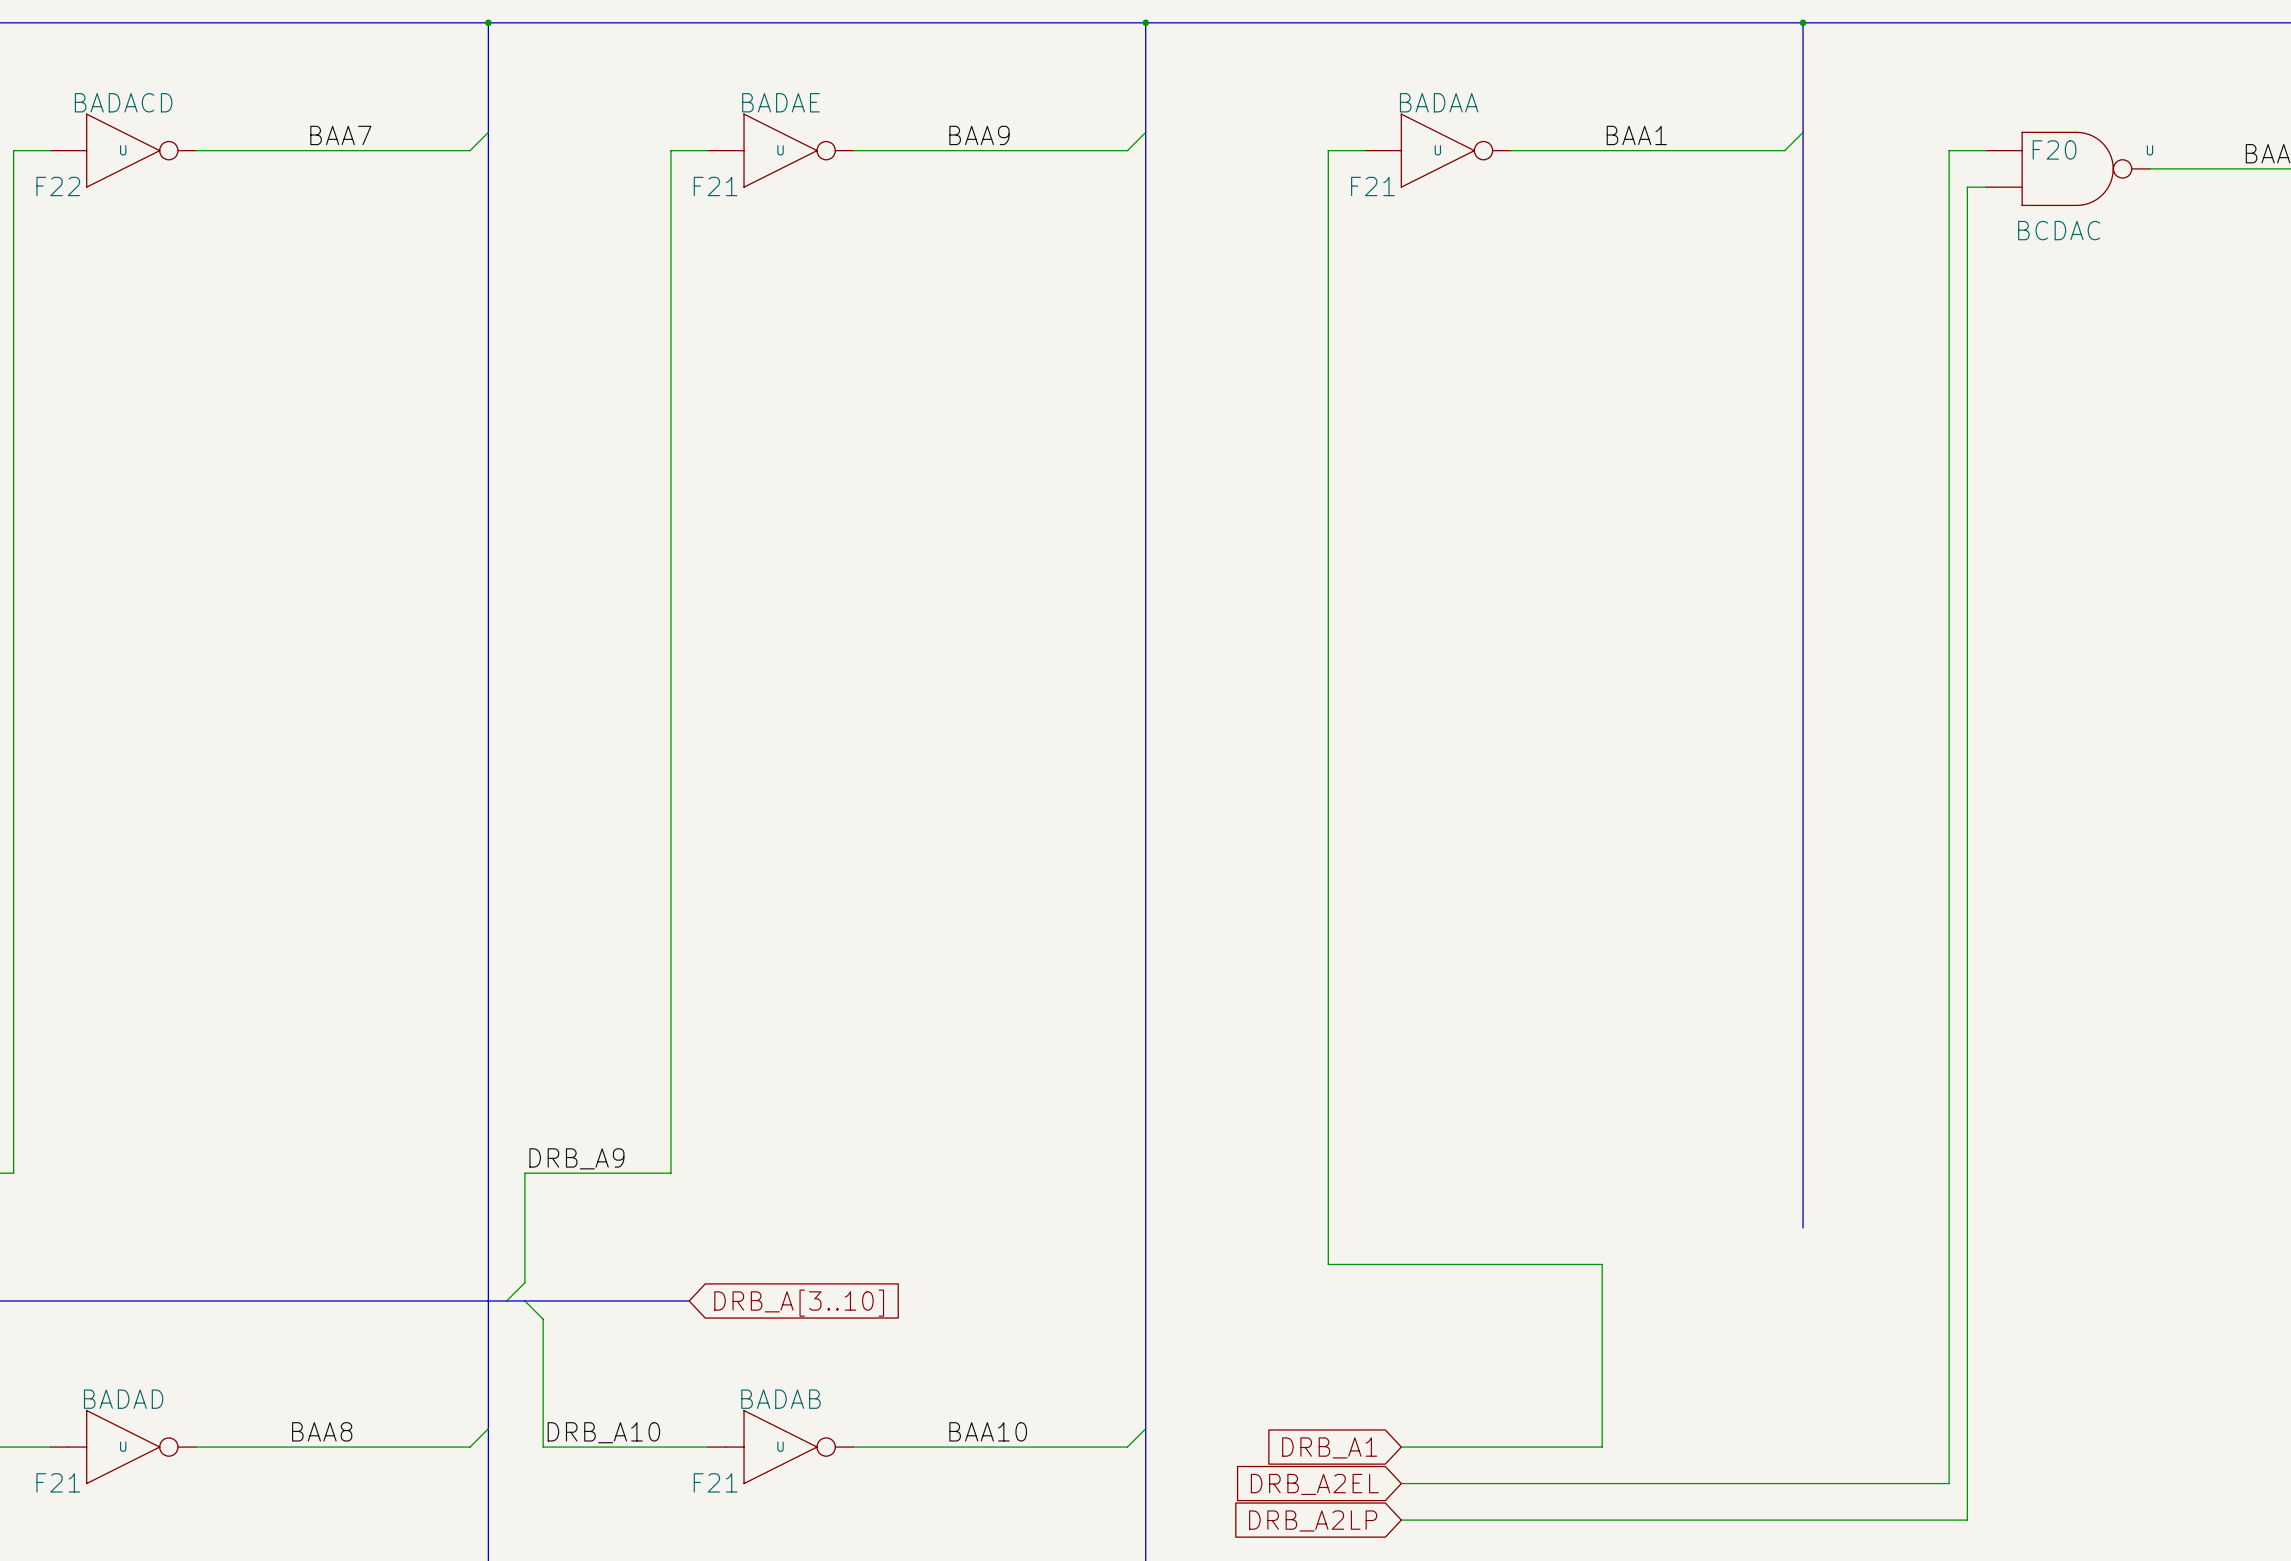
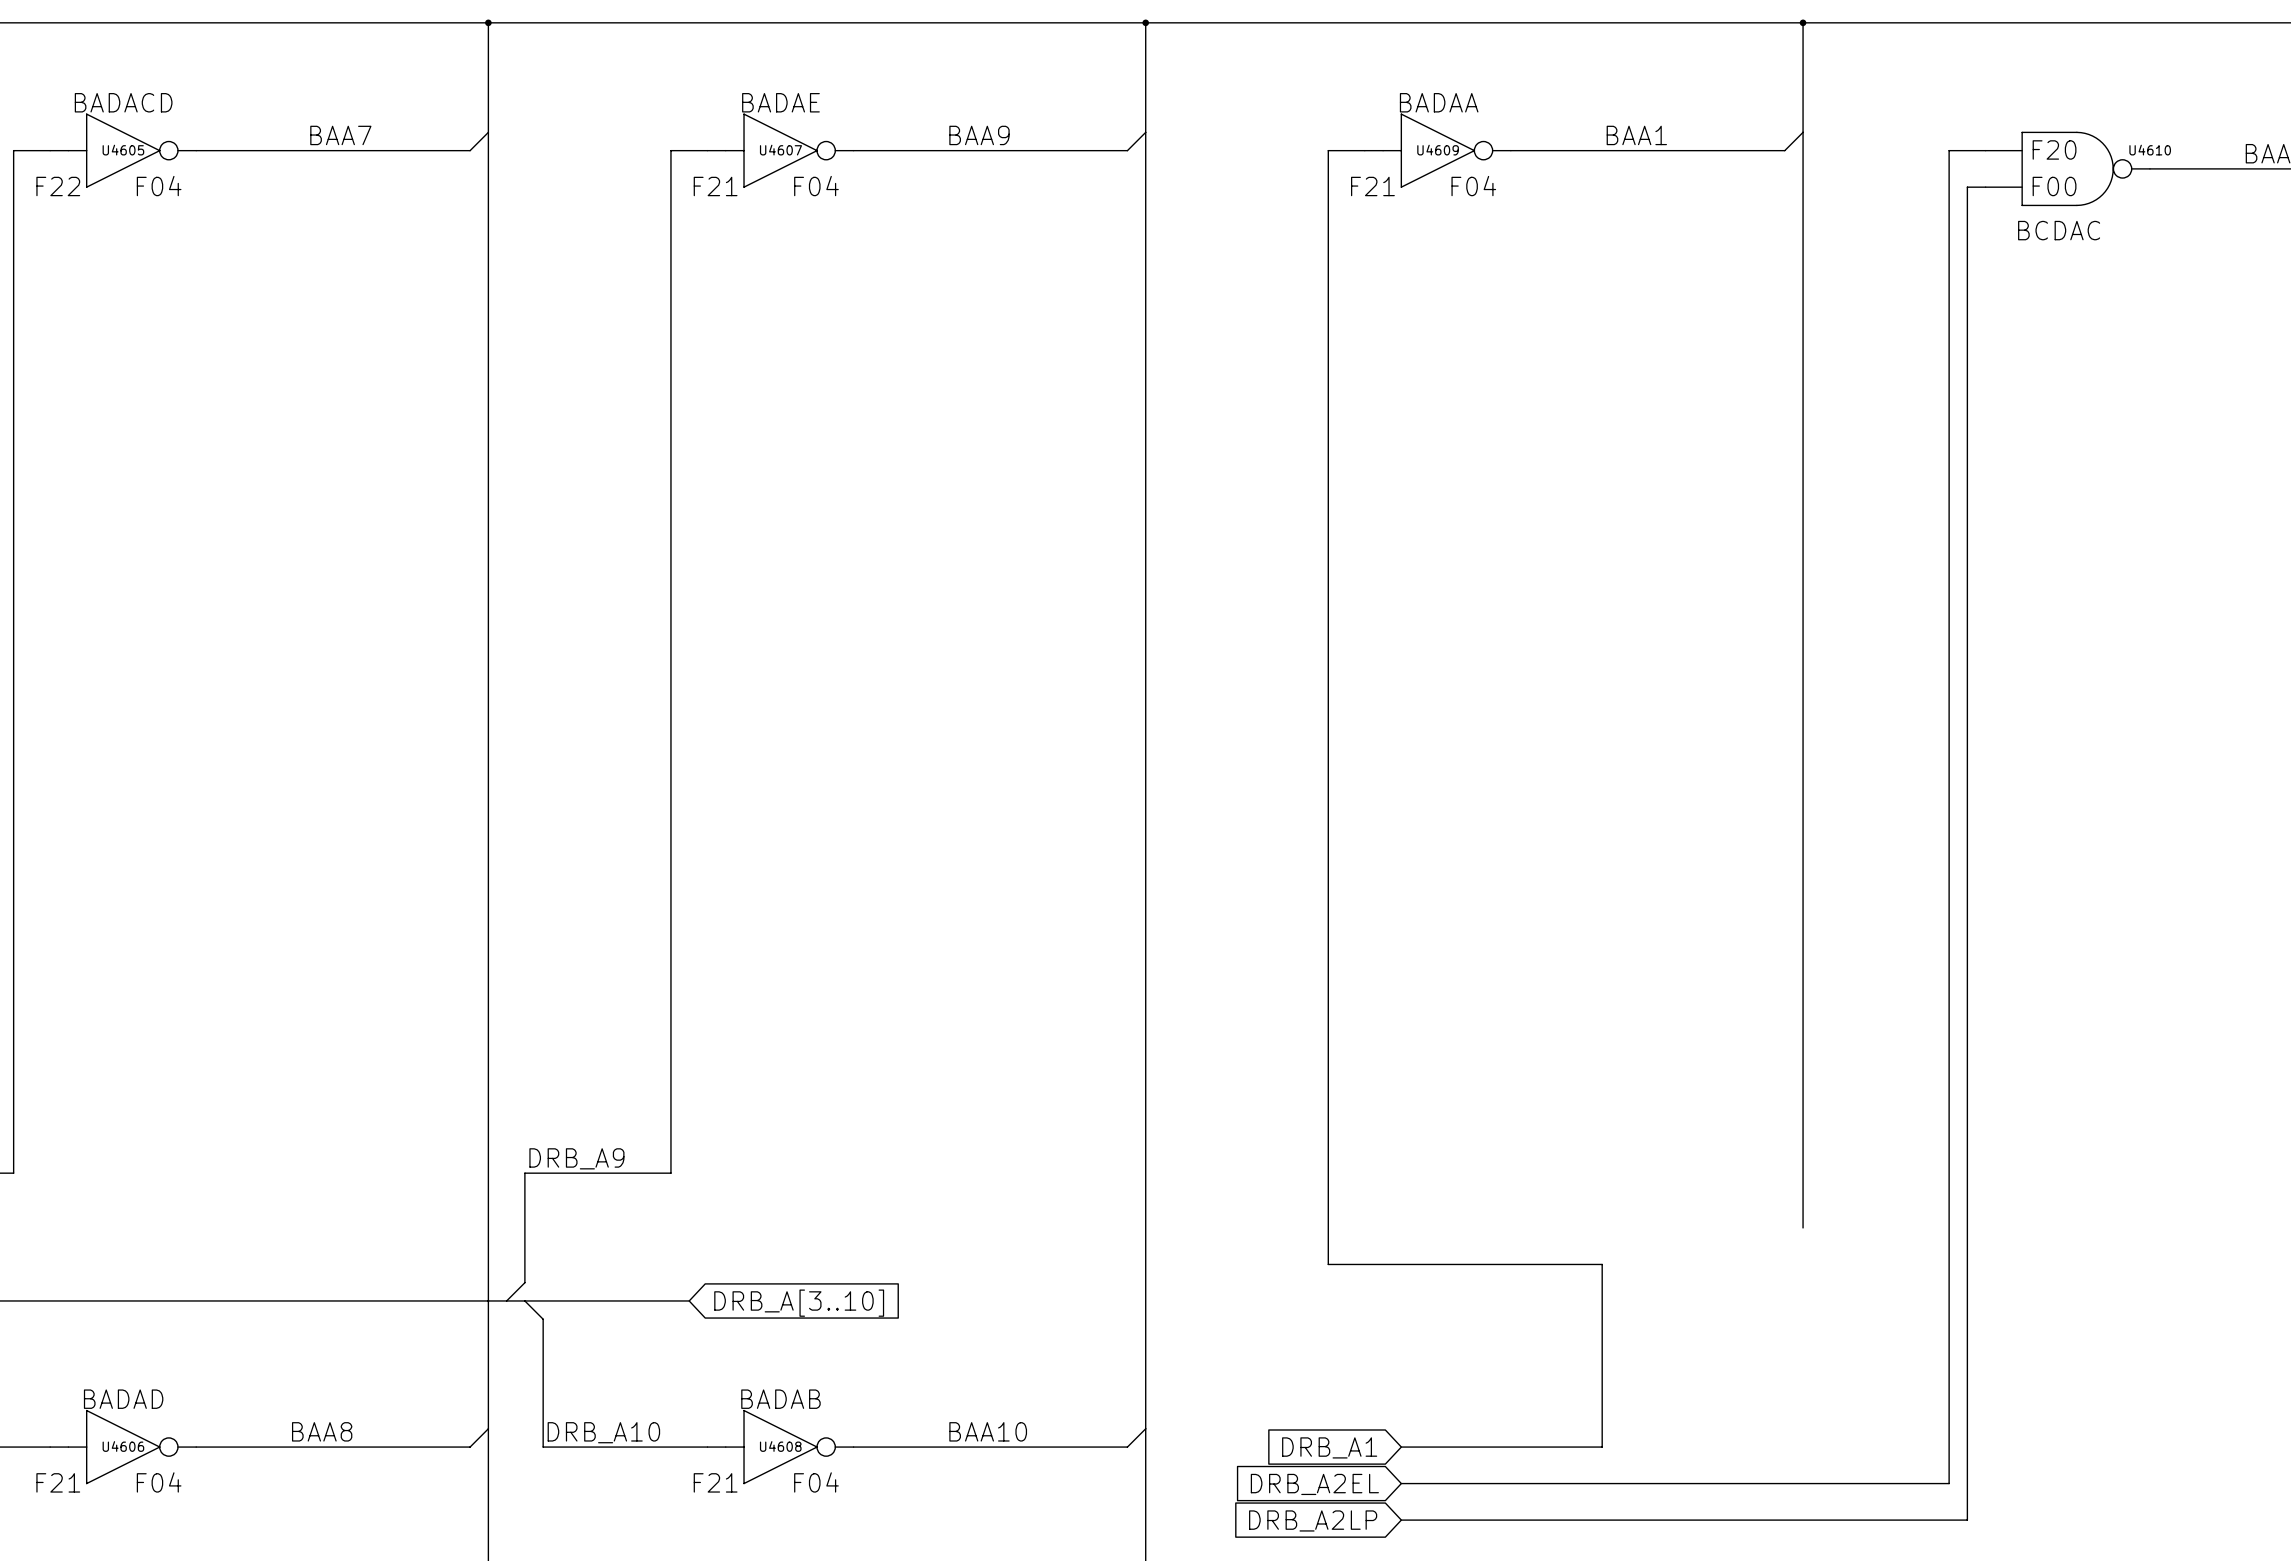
U name: U (123, 150) -> U4605 (123, 150)
U name: U (780, 150) -> U4607 (780, 150)
U name: U (1437, 150) -> U4609 (1438, 150)
U name: U (2149, 150) -> U4610 (2150, 150)
U value: none -> F04 (159, 186)
U value: none -> F04 (816, 186)
U value: none -> F04 (1473, 186)
U value: none -> F00 (2054, 186)
U name: U (123, 1446) -> U4606 (123, 1446)
U name: U (780, 1446) -> U4608 (780, 1446)
U value: none -> F04 (159, 1482)
U value: none -> F04 (816, 1482)

